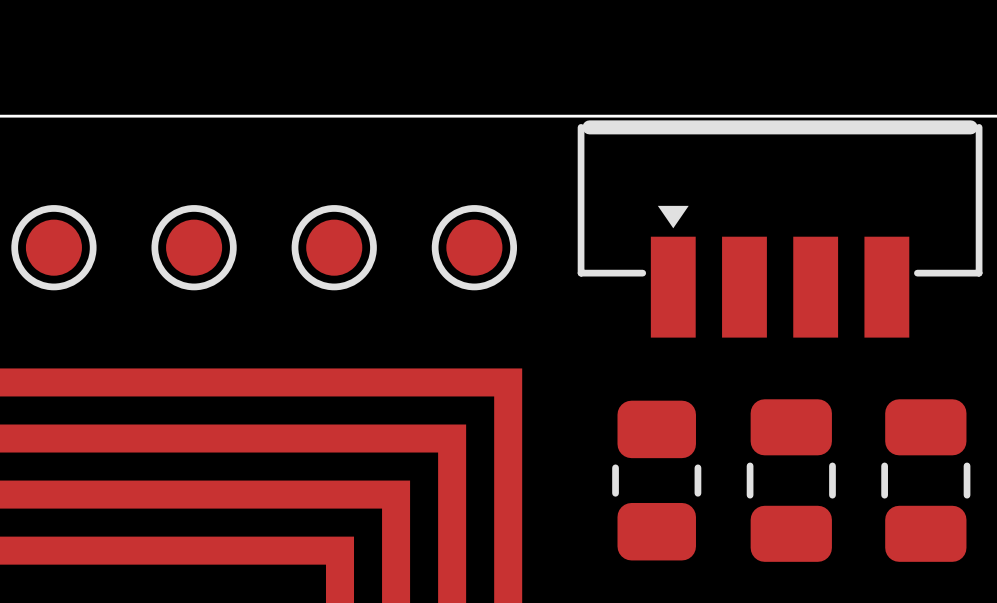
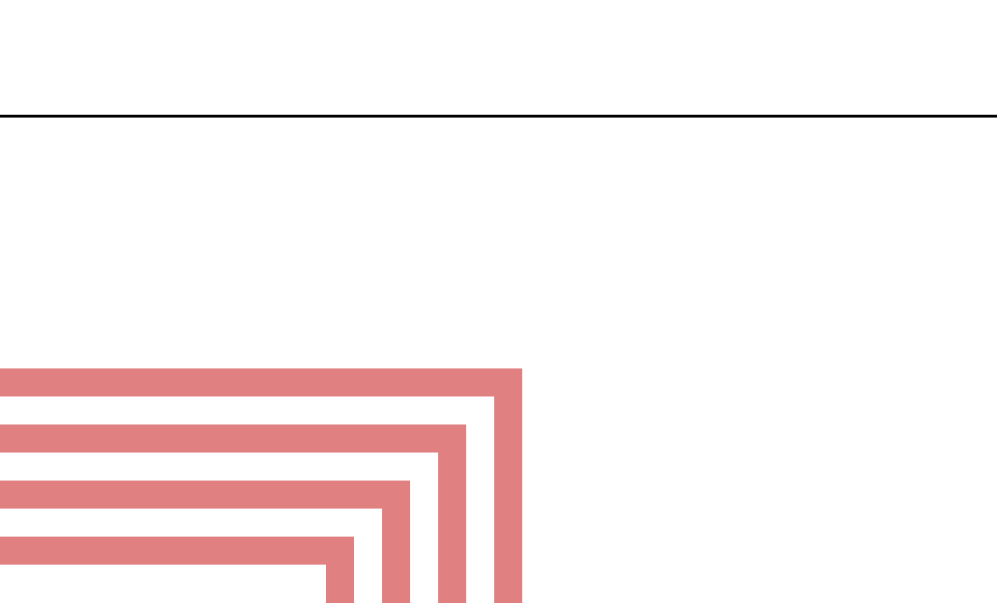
part: (780, 228) -> none
part: (53, 247) -> none
part: (194, 247) -> none
part: (334, 247) -> none
part: (474, 247) -> none
part: (656, 480) -> none
part: (791, 480) -> none
part: (925, 480) -> none

